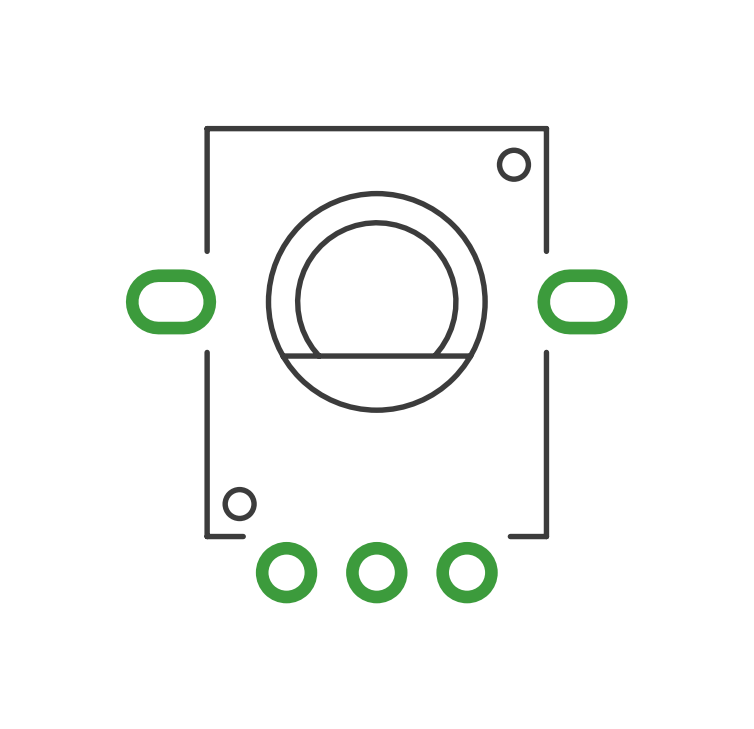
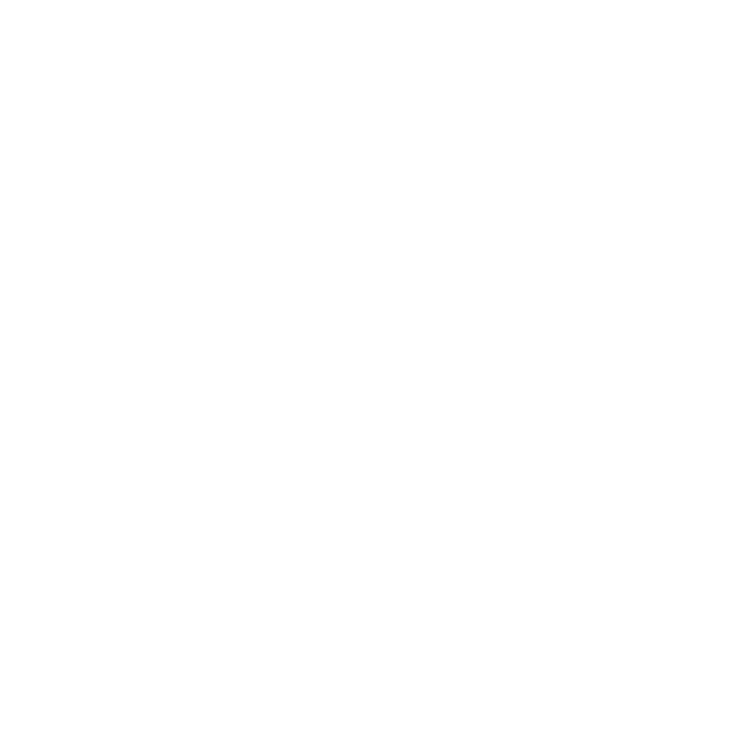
part: (376, 364) -> none

